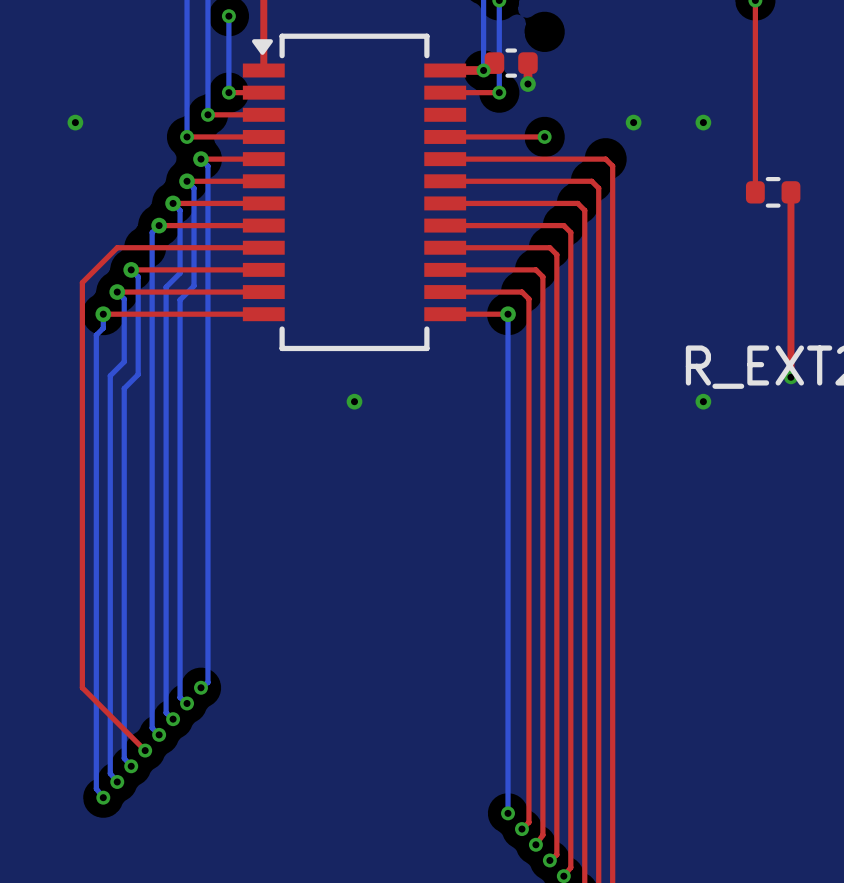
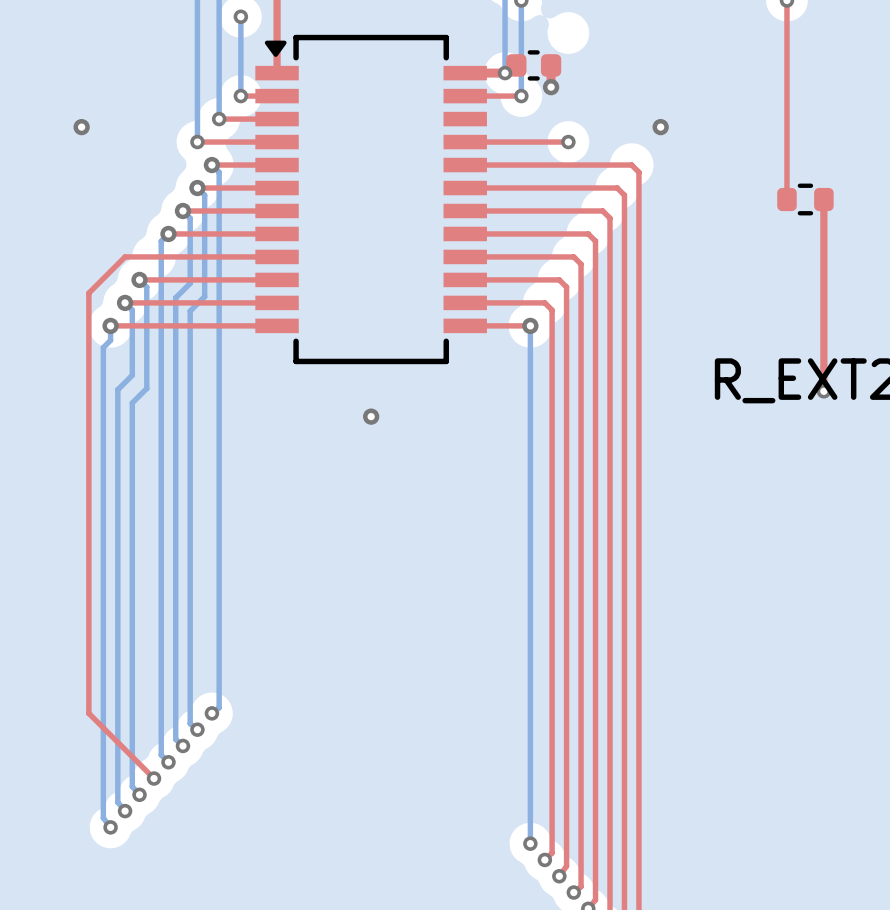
via: (703, 122) -> none
via: (703, 401) -> none

